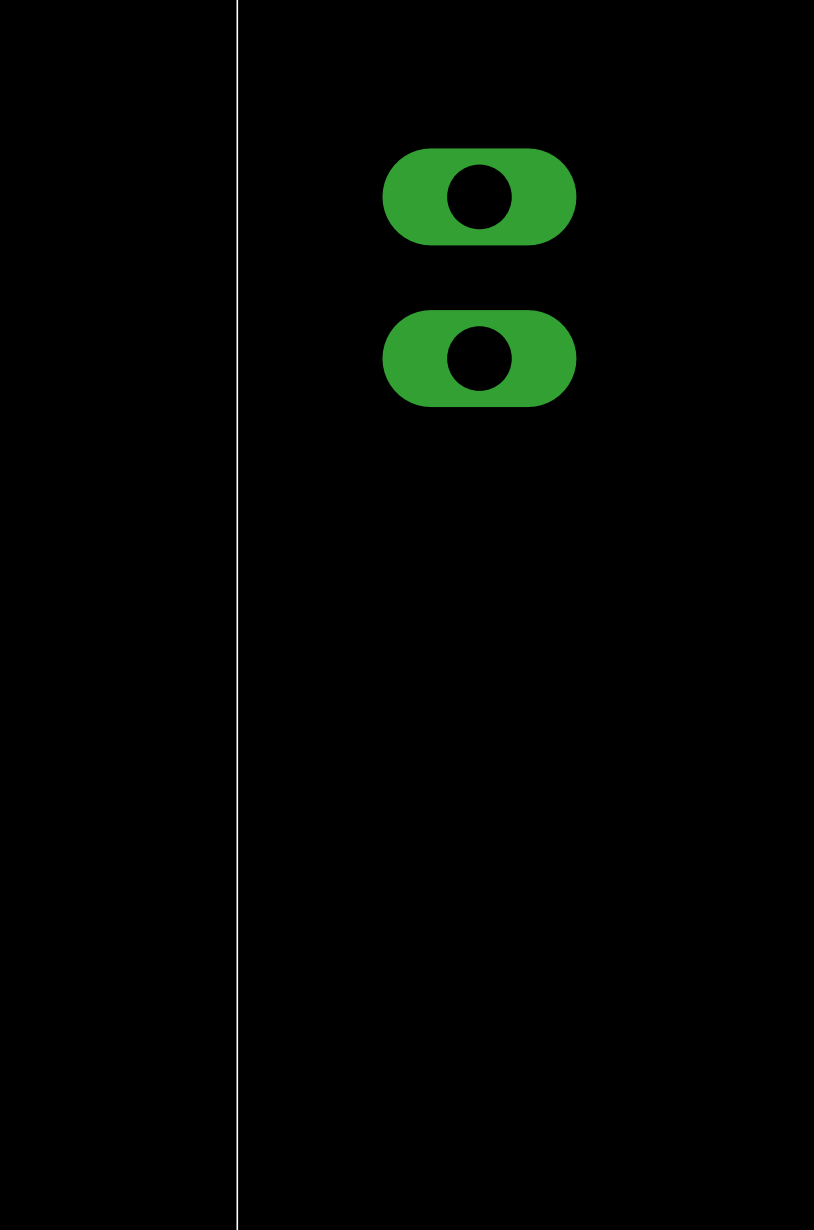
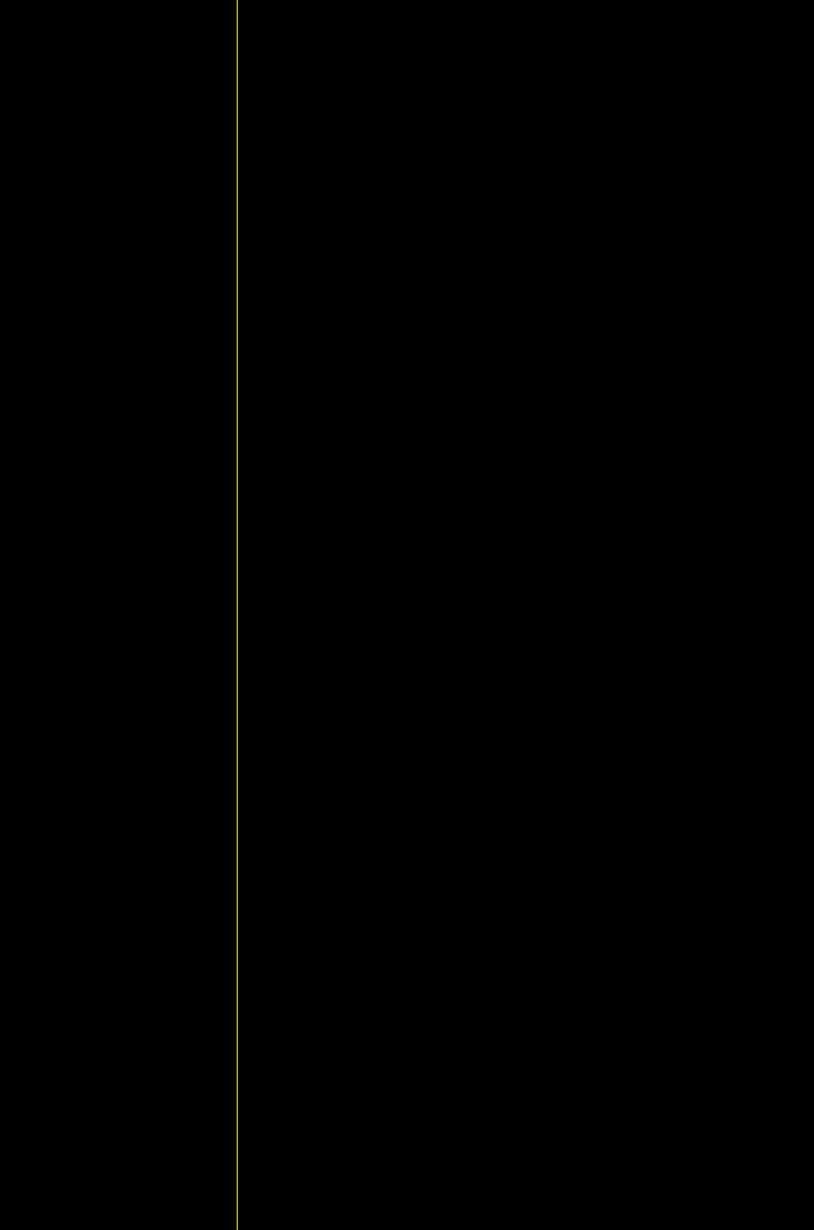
part: (479, 277) -> none

